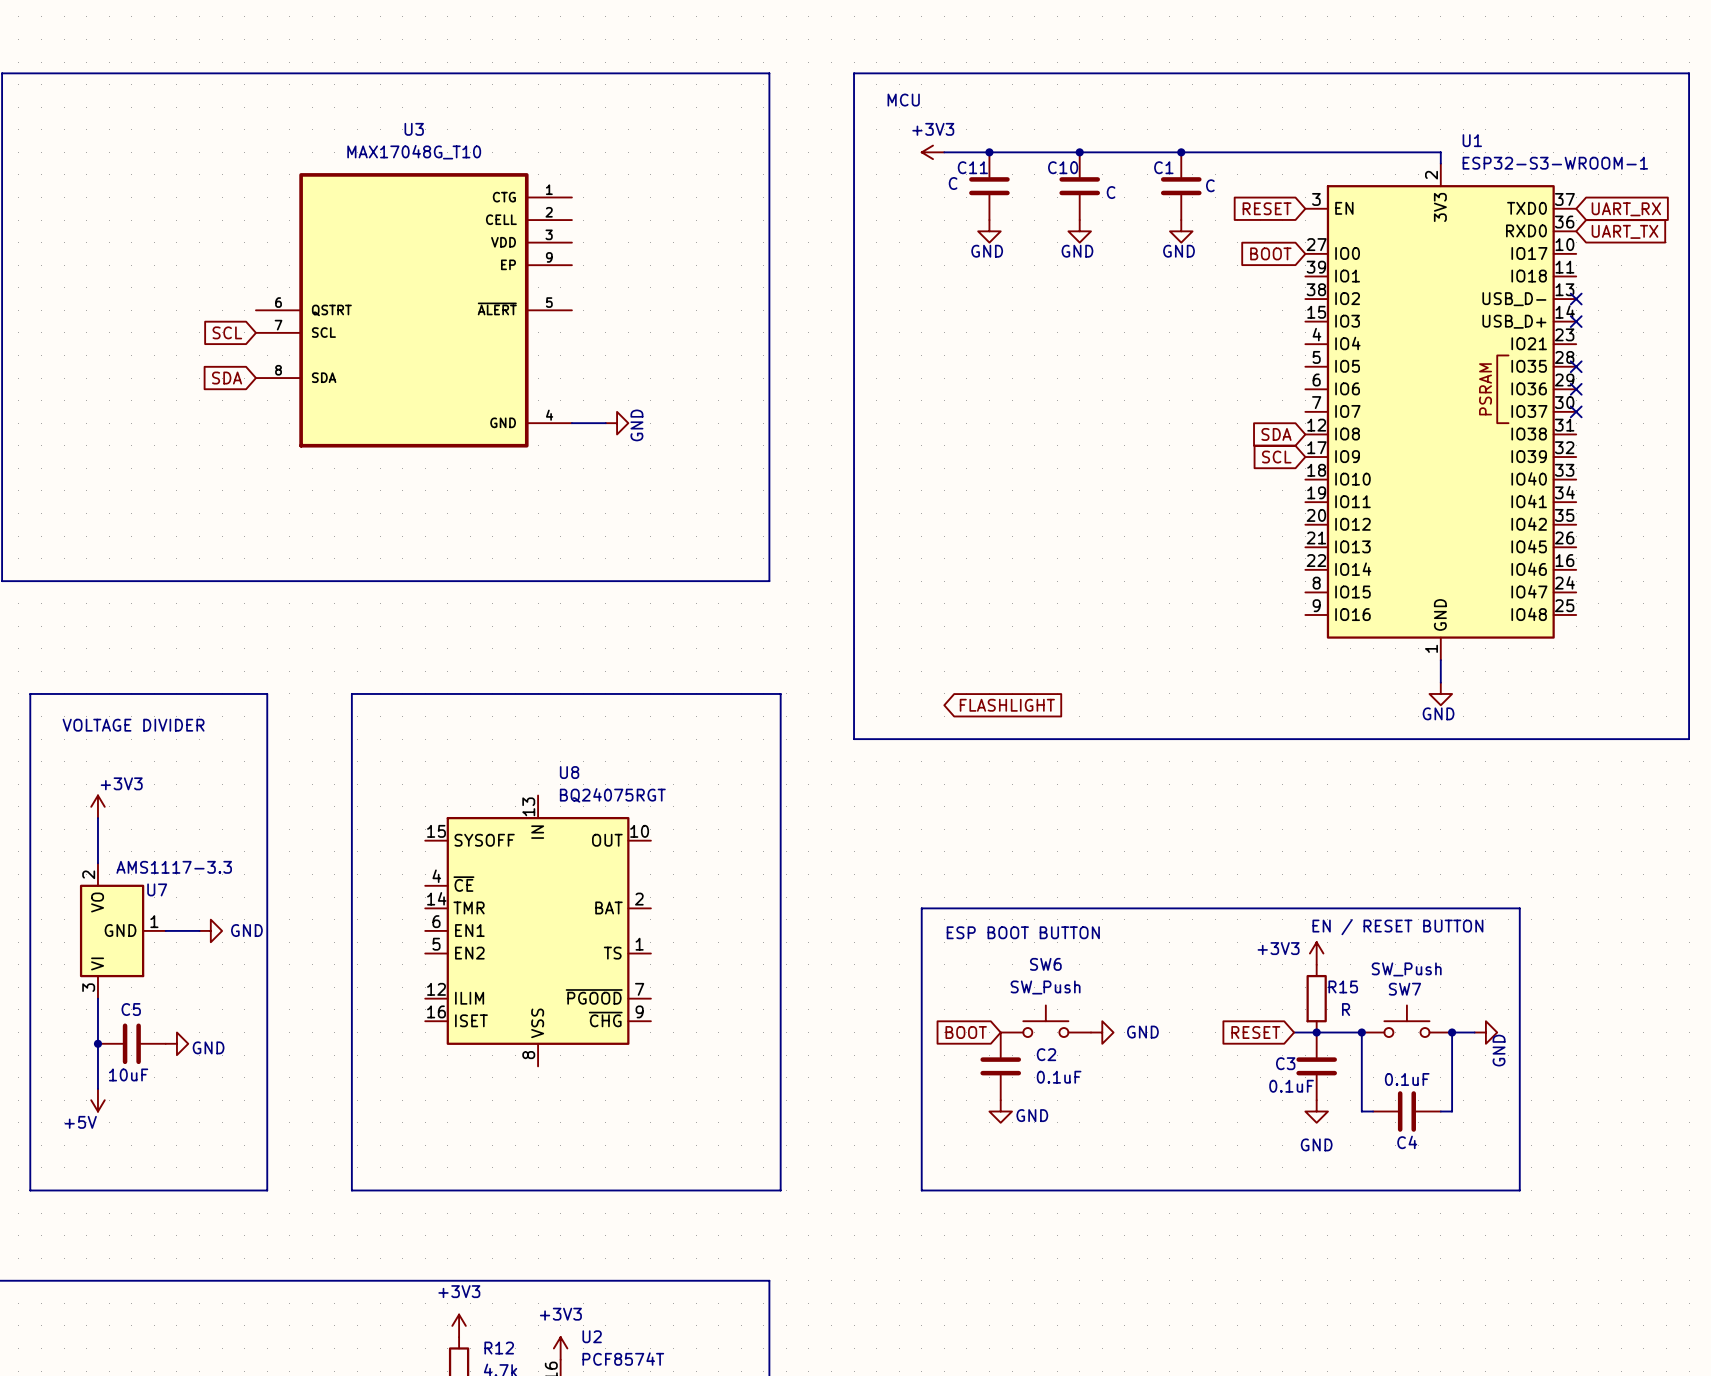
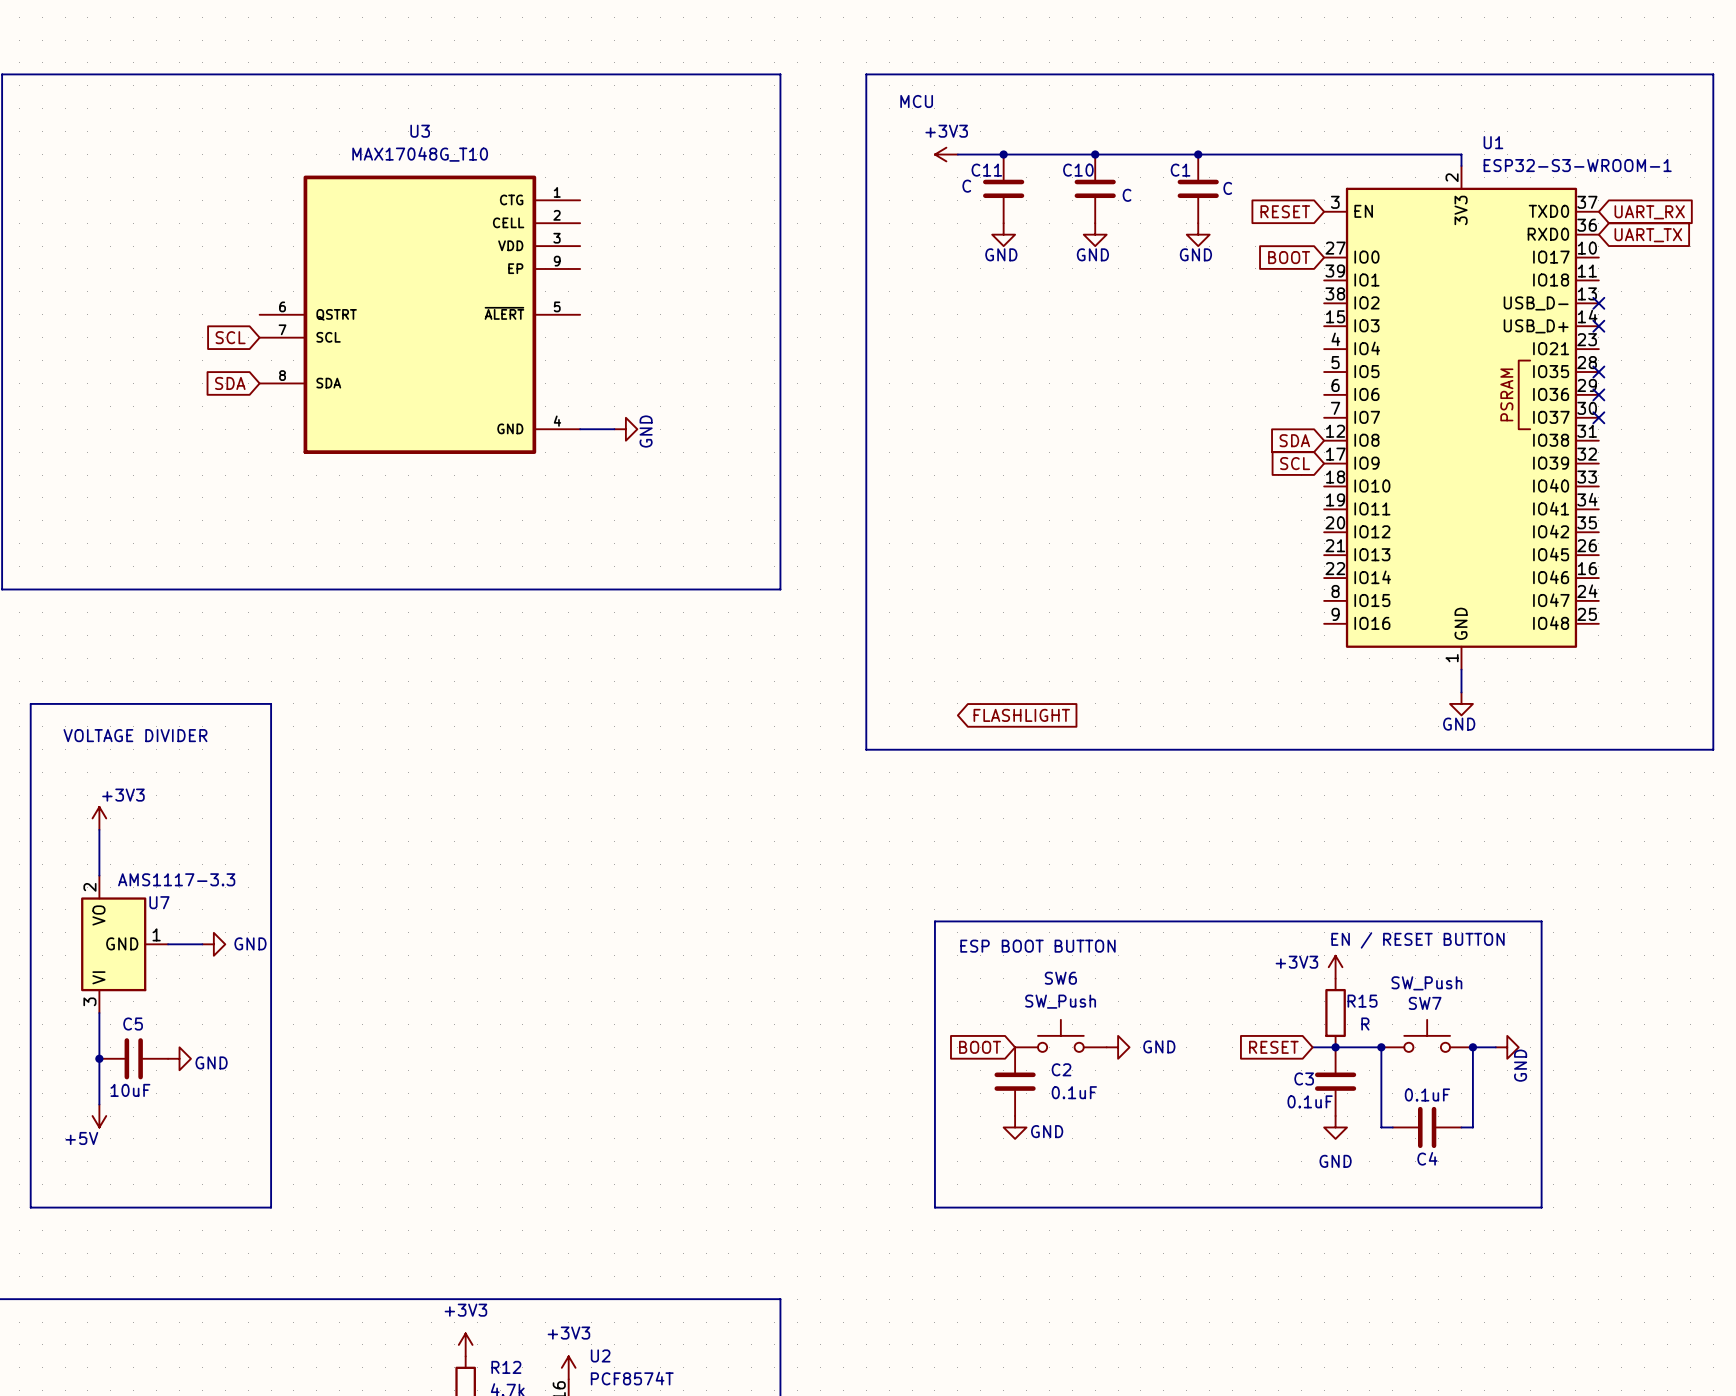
line: (351, 693) (780, 693) (780, 1190) (351, 1190) (351, 693) -> none
U8: BQ24075RGT (538, 930) -> none

